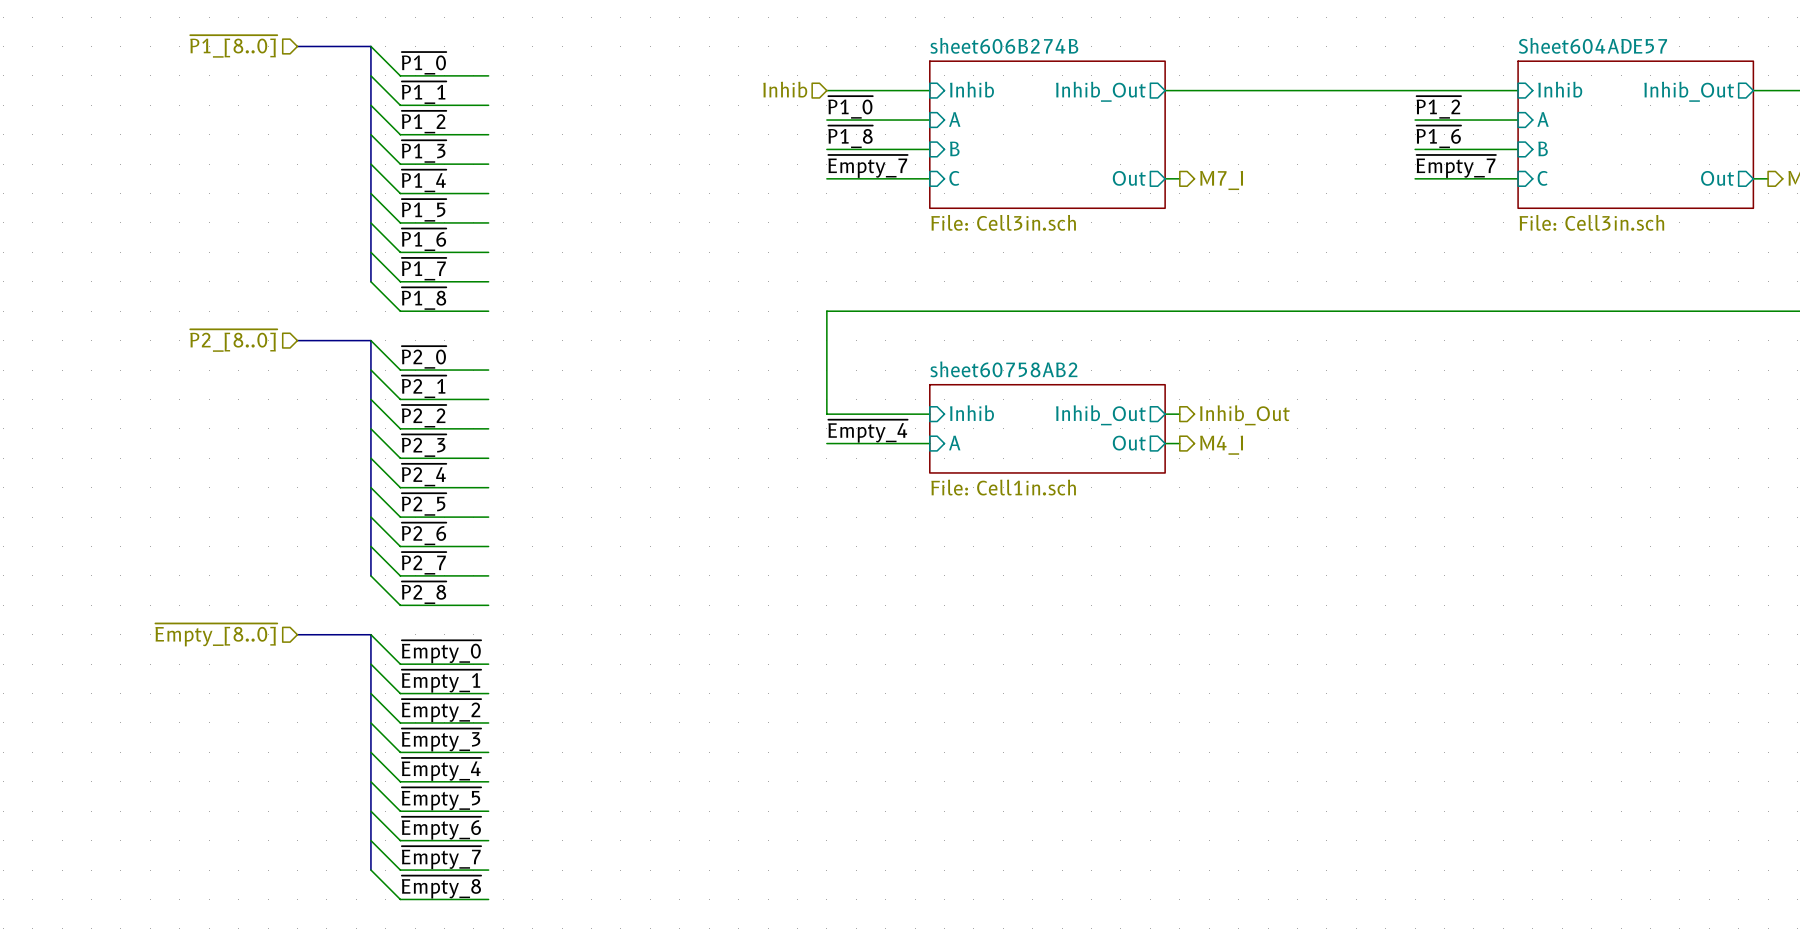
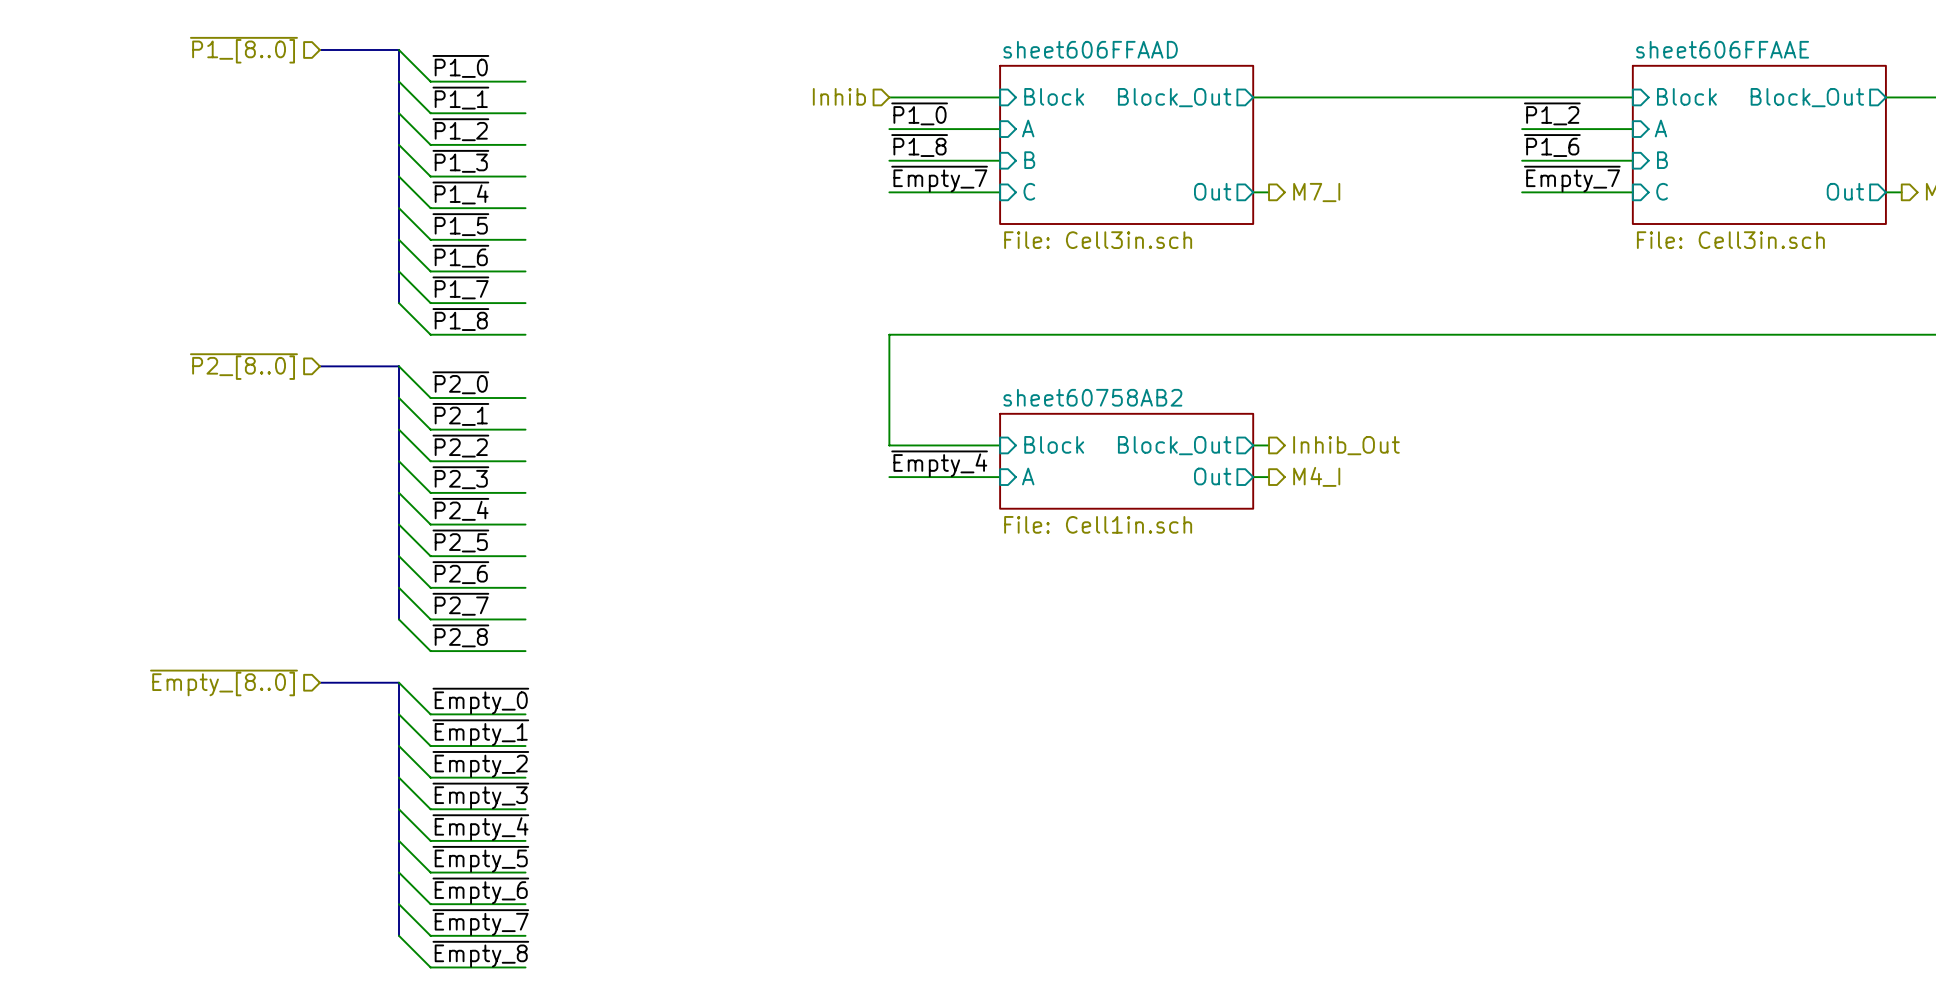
sheet sheet606B274B name: sheet606B274B (1004, 45) -> sheet606FFAAD (1090, 49)
sheet Sheet604ADE57 name: Sheet604ADE57 (1592, 45) -> sheet606FFAAE (1722, 49)
sheet pin: Inhib (971, 89) -> Block (1054, 96)
sheet pin: Inhib (1560, 89) -> Block (1686, 96)
sheet pin: Inhib_Out (1100, 91) -> Block_Out (1174, 97)
sheet pin: Inhib_Out (1689, 91) -> Block_Out (1807, 97)
sheet pin: Inhib (971, 413) -> Block (1054, 444)
sheet pin: Inhib_Out (1100, 415) -> Block_Out (1174, 445)

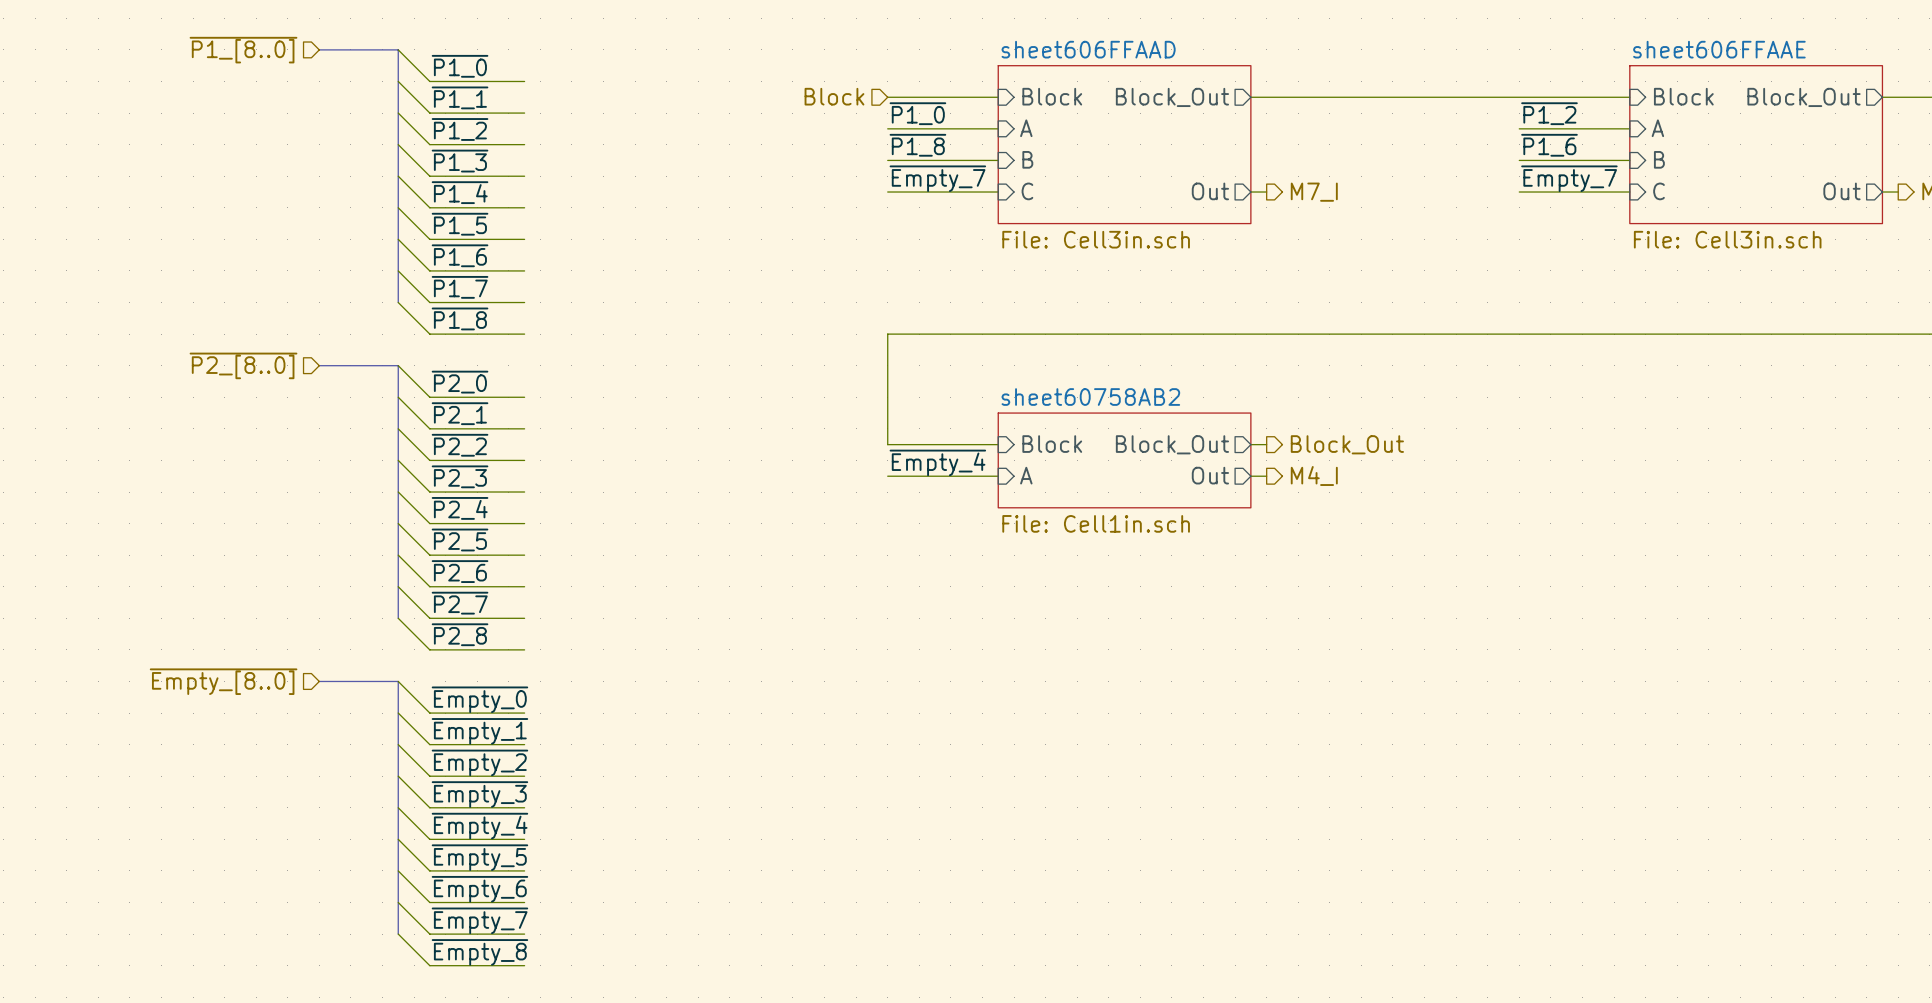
hierarchical label: Inhib (839, 96) -> Block (834, 96)
hierarchical label: Inhib_Out (1346, 445) -> Block_Out (1347, 444)

